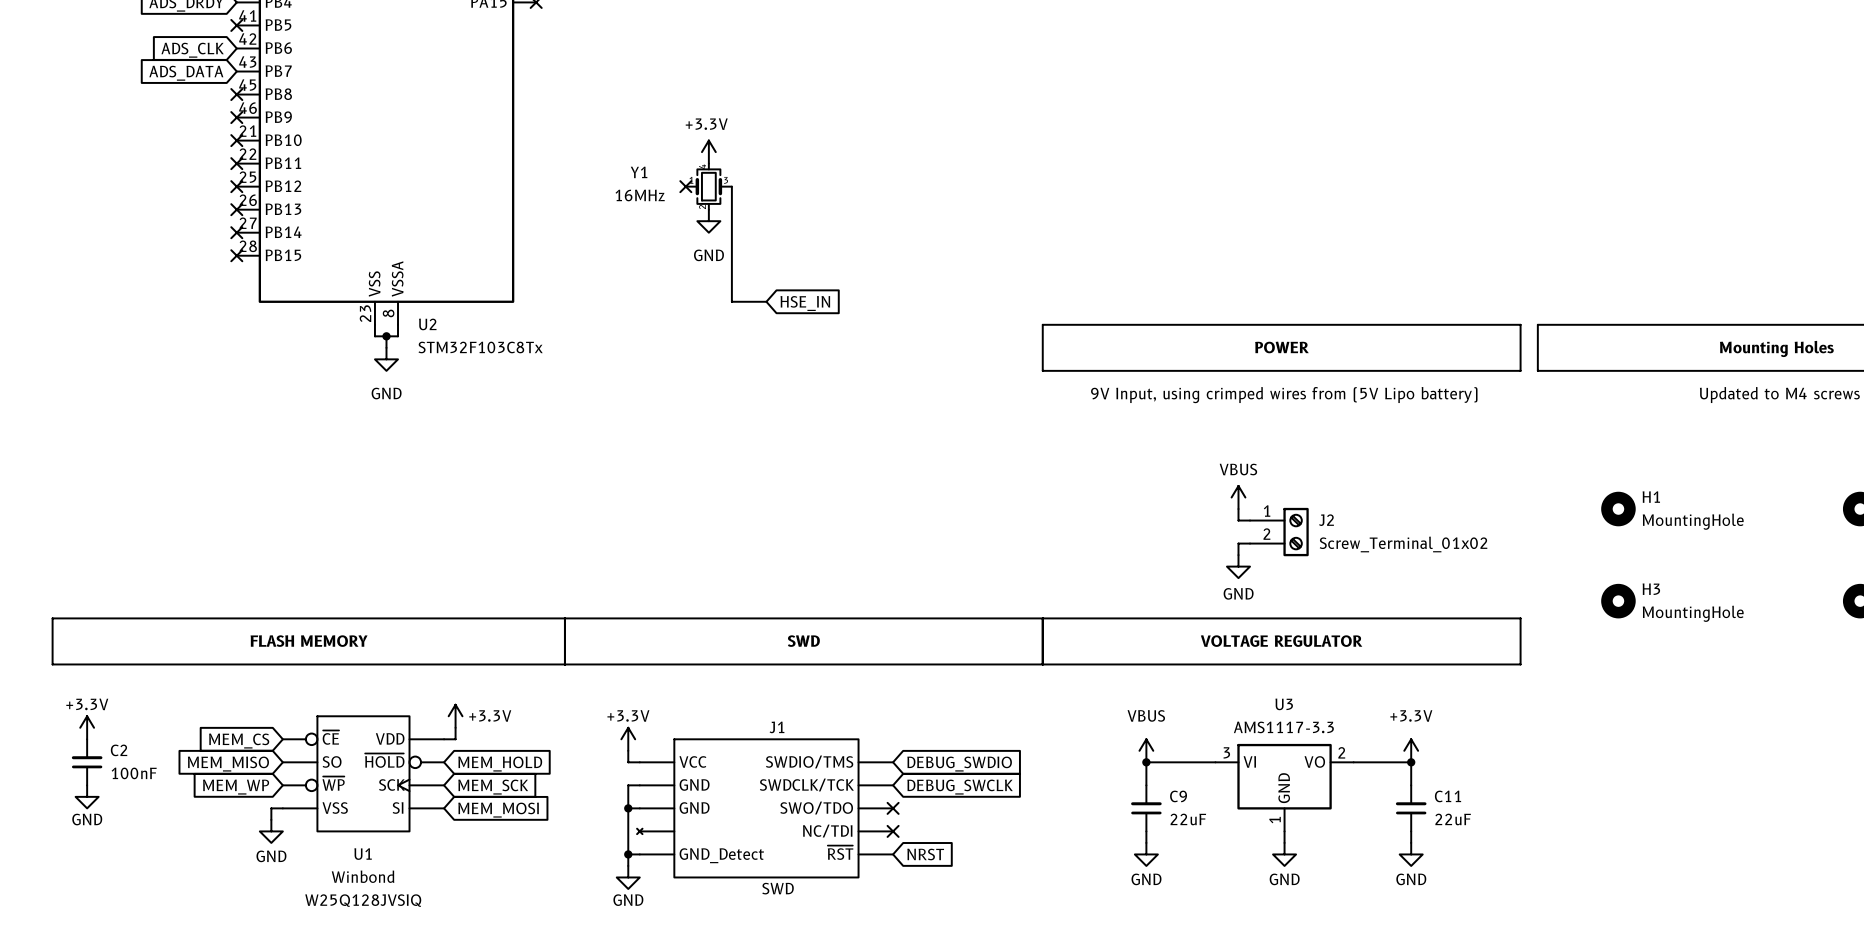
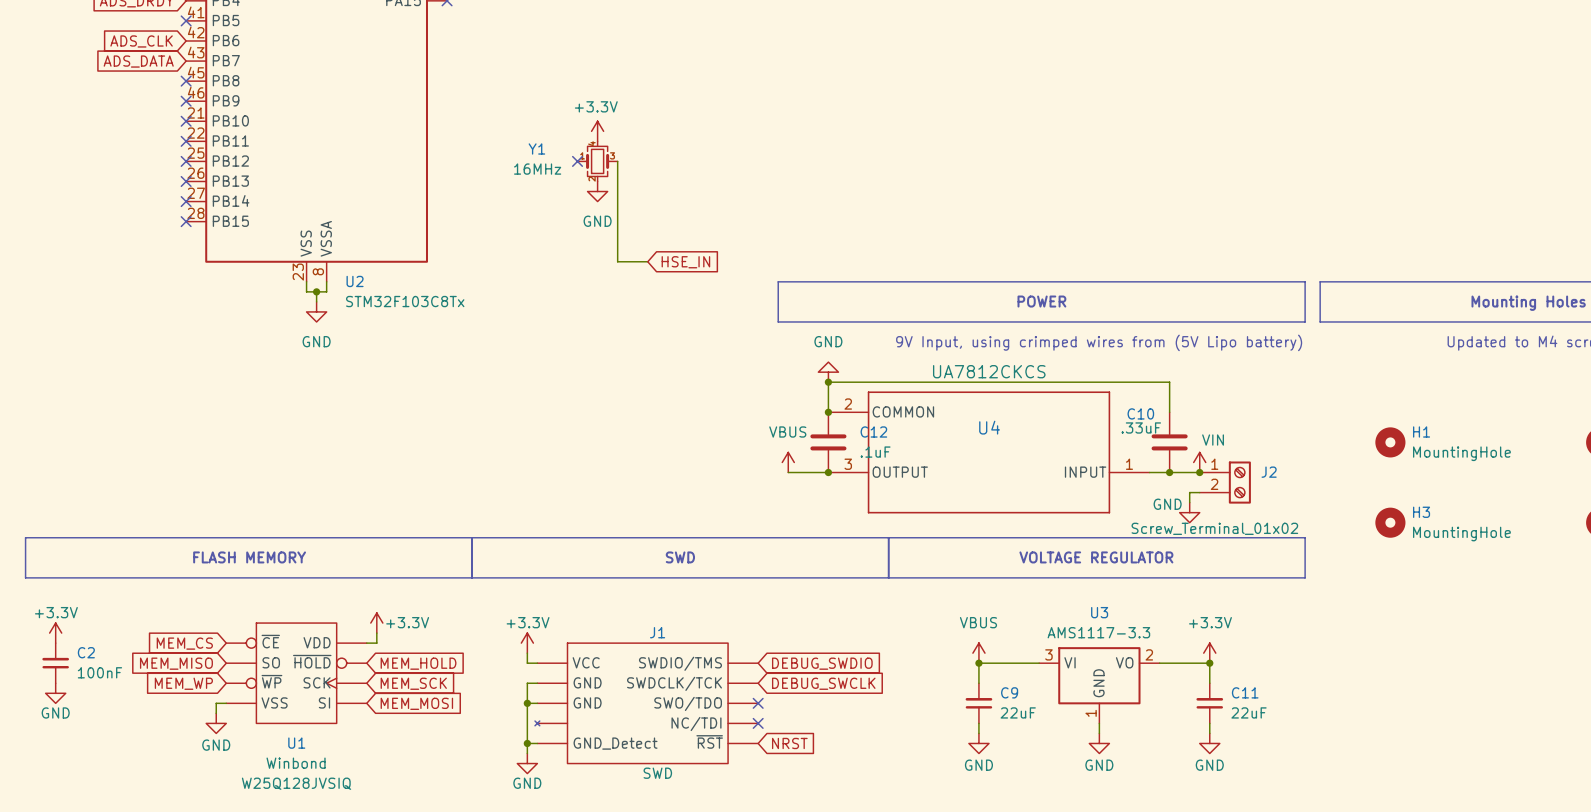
line: (1042, 324) (1042, 370) -> (888, 281) (778, 281) (778, 321) (888, 321)
text position: POWER (1281, 347) -> POWER (1041, 301)
power symbol: none -> GND (828, 372)
junction: none -> (828, 382)
wire: none -> (828, 412) (828, 382) (1169, 382) (1169, 412)
junction: none -> (828, 412)
power symbol: VBUS (1238, 497) -> none
C12: none -> .1uF (828, 442)
wire: (1238, 509) (1238, 520) (1250, 520) -> none
C10: none -> .33uF (1169, 442)
U4: none -> UA7812CKCS (988, 452)
power symbol: none -> VBUS (788, 462)
J2 position: (1279, 532) -> (1225, 482)
power symbol: none -> VIN (1199, 462)
wire: none -> (788, 472) (828, 472)
junction: none -> (828, 472)
wire: (1250, 543) (1238, 543) (1238, 555) -> (1199, 492) (1189, 492) (1189, 502)
wire: none -> (1149, 472) (1199, 472)
junction: none -> (1169, 472)
junction: none -> (1199, 472)
J2 value position: Screw_Terminal_01x02 (1403, 544) -> Screw_Terminal_01x02 (1214, 528)
power symbol: GND (1238, 566) -> none
power symbol: none -> GND (1189, 512)

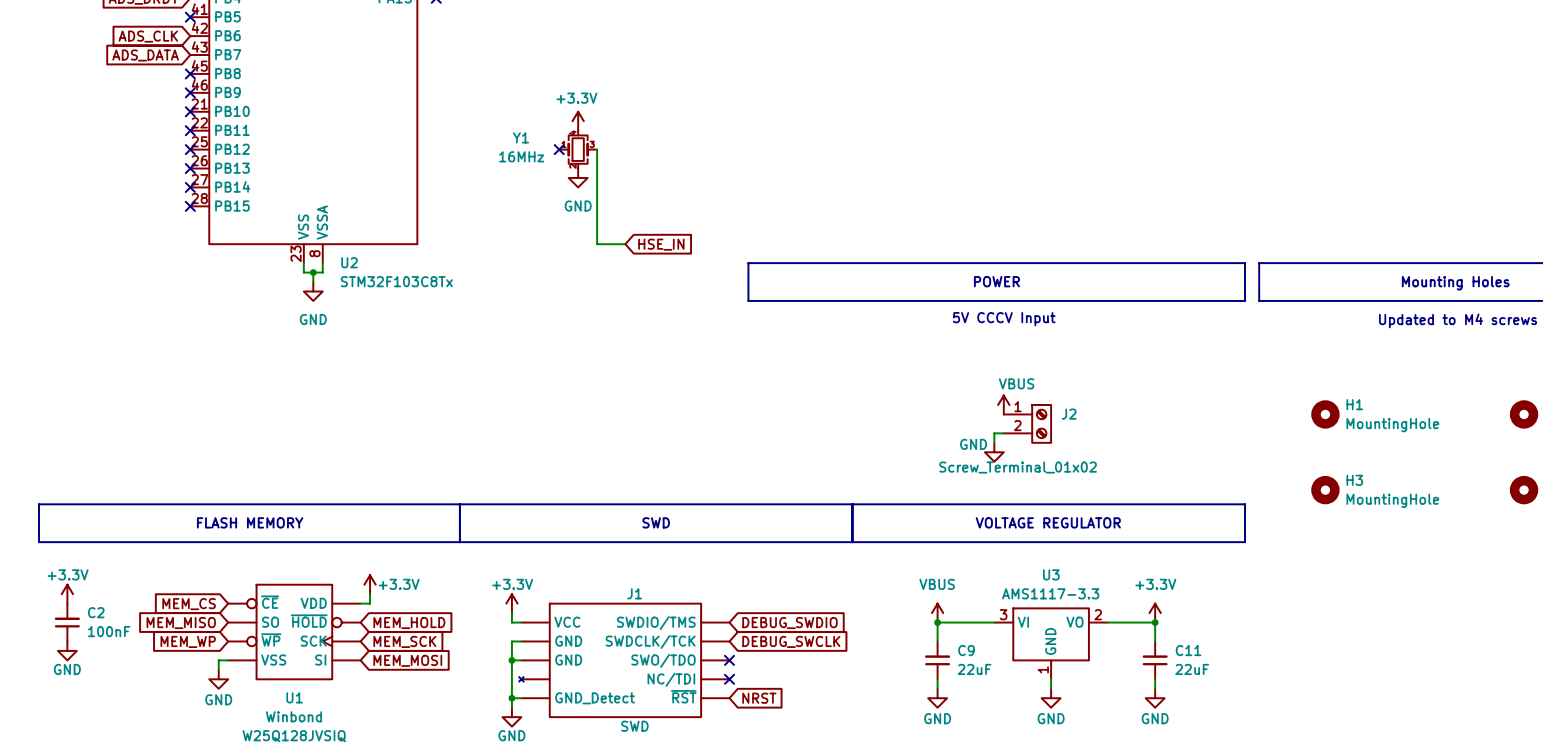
text: none -> 5V CCCV Input (1004, 319)
text: 9V Input, using crimped wires from (5V Lipo battery) (1099, 342) -> none
power symbol: GND (828, 372) -> none
junction: (828, 382) -> none
wire: (828, 412) (828, 382) (1169, 382) (1169, 412) -> none
junction: (828, 412) -> none
power symbol: none -> VBUS (1003, 405)
C12: .1uF (828, 442) -> none
C10: .33uF (1169, 442) -> none
U4: UA7812CKCS (988, 452) -> none
power symbol: VBUS (788, 462) -> none
power symbol: VIN (1199, 462) -> none
wire: (788, 472) (828, 472) -> none
junction: (828, 472) -> none
wire: (1149, 472) (1199, 472) -> none
junction: (1169, 472) -> none
junction: (1199, 472) -> none
power symbol: none -> GND (994, 452)
J2 position: (1225, 482) -> (1027, 423)
wire: (1199, 492) (1189, 492) (1189, 502) -> (1003, 433) (994, 433) (994, 442)
power symbol: GND (1189, 512) -> none

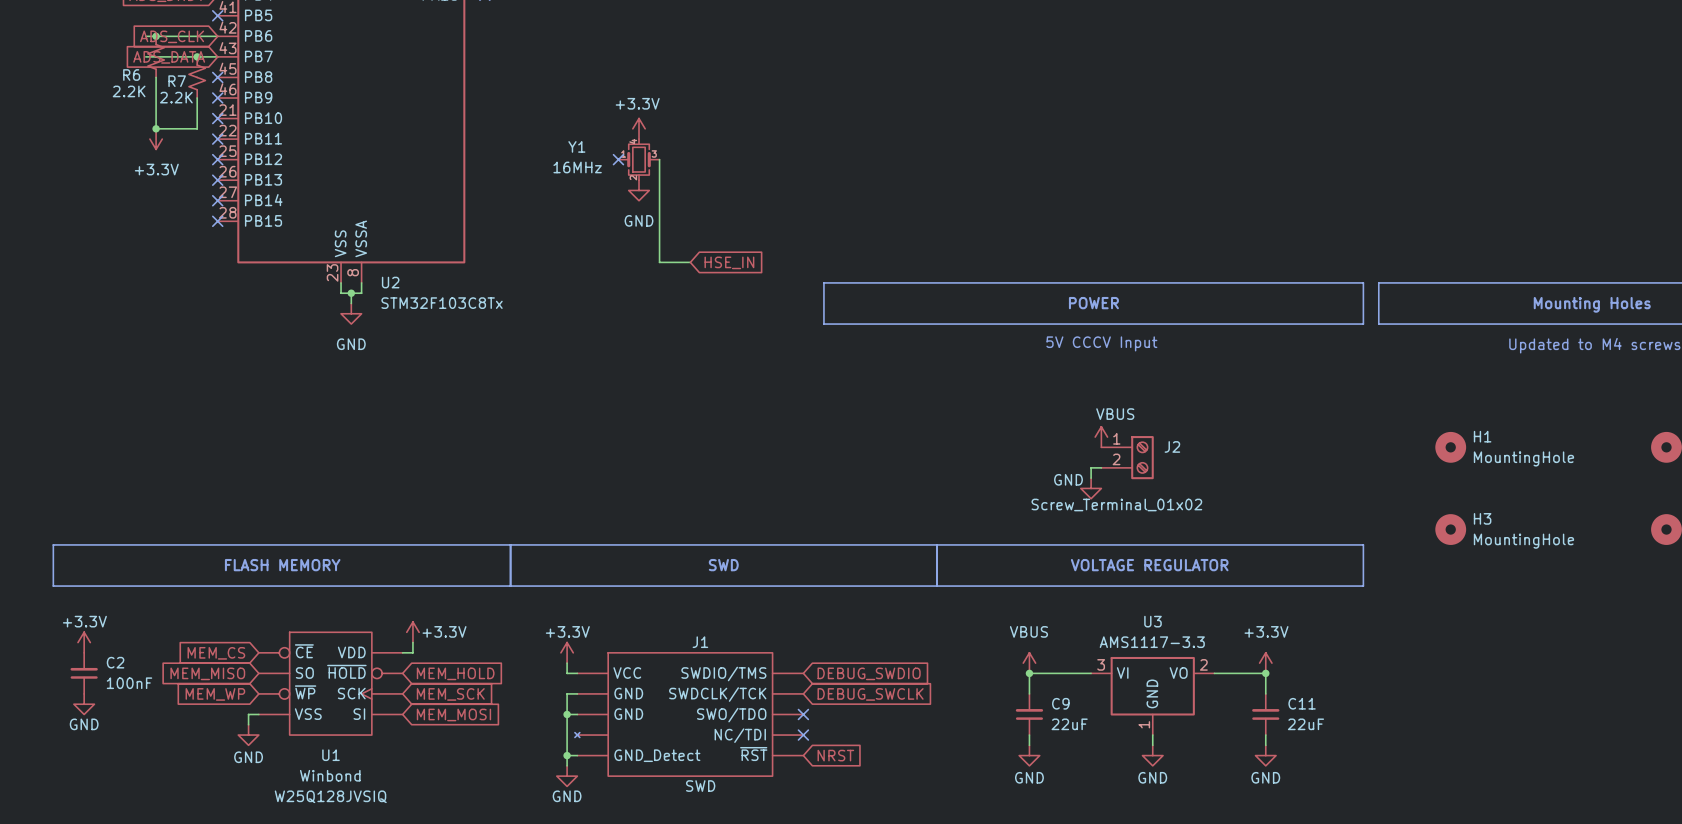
wire: none -> (145, 36) (217, 36)
junction: none -> (156, 36)
wire: none -> (145, 56) (217, 56)
R6: none -> 2.2K (156, 56)
junction: none -> (197, 56)
wire: none -> (156, 77) (156, 128) (197, 128) (197, 97)
R7: none -> 2.2K (197, 77)
junction: none -> (156, 128)
power symbol: none -> +3.3V (156, 139)

